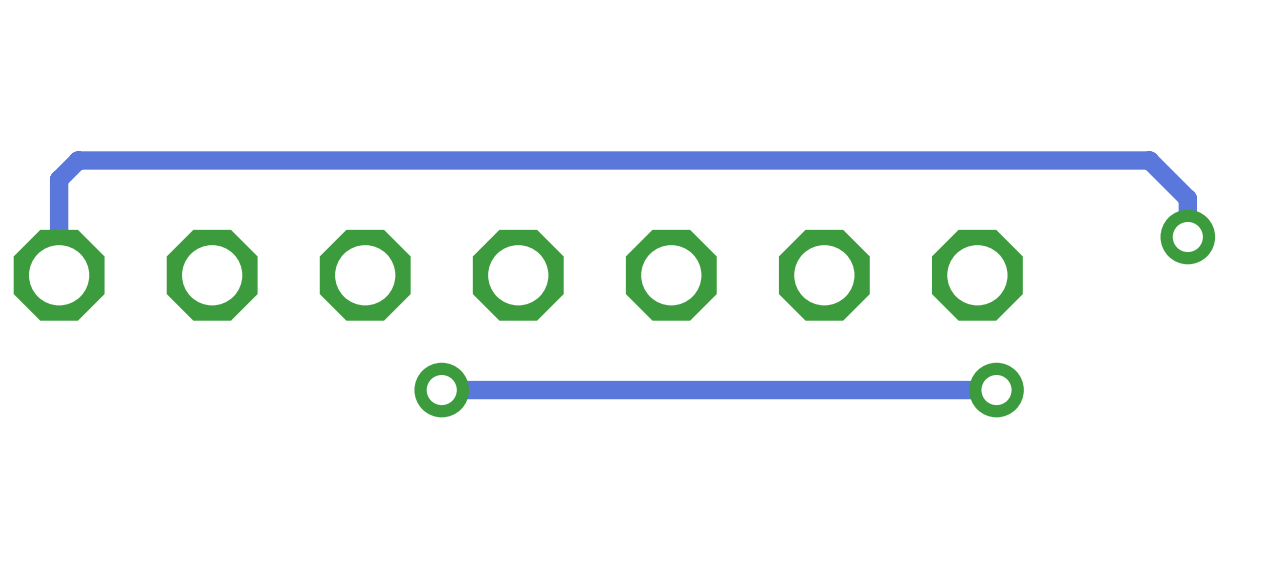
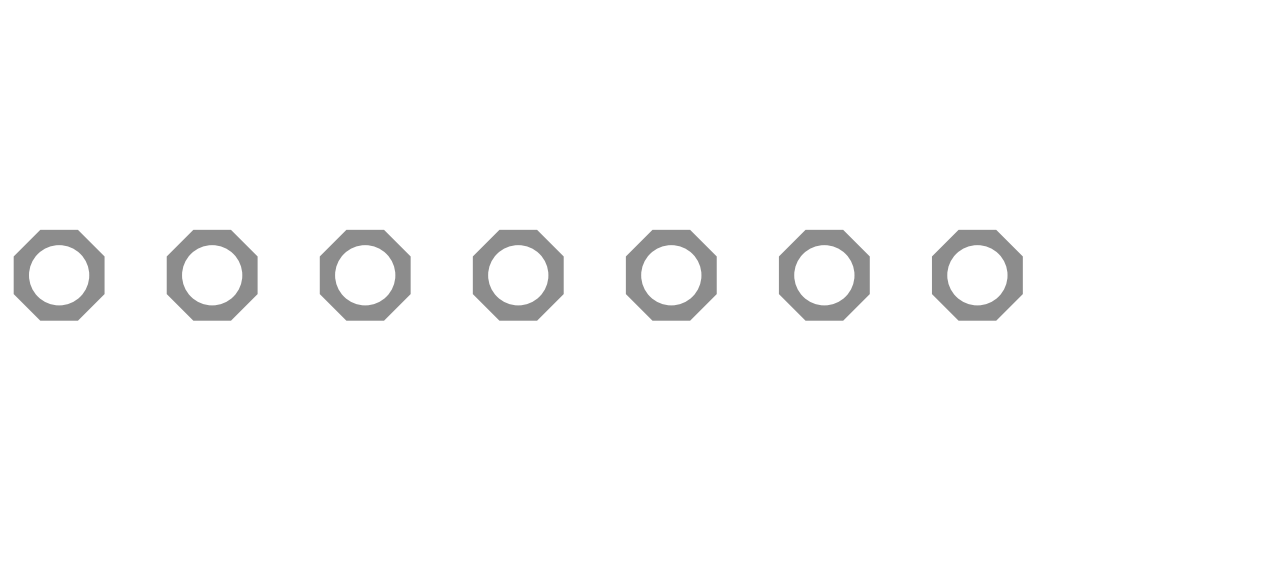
track: (1187, 237) (1187, 198) (1149, 160) (78, 160) (59, 179) (59, 275) -> none
via: (1187, 237) -> none
via: (441, 390) -> none
track: (996, 390) (441, 390) -> none
via: (996, 390) -> none

